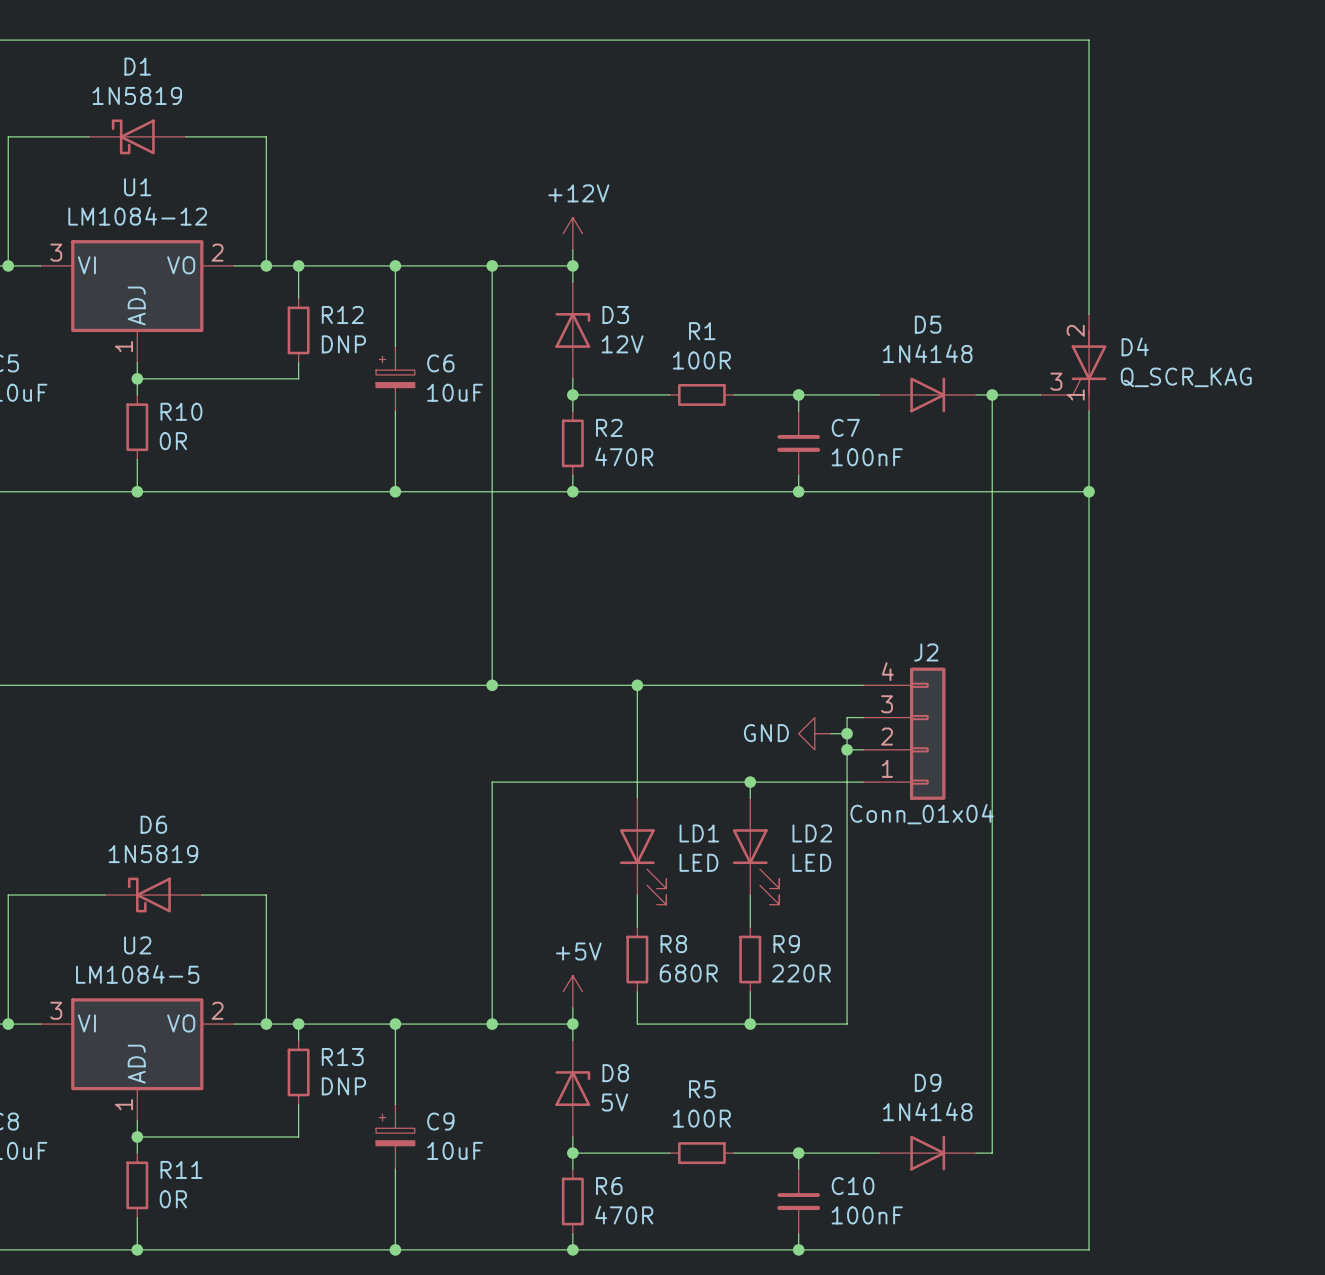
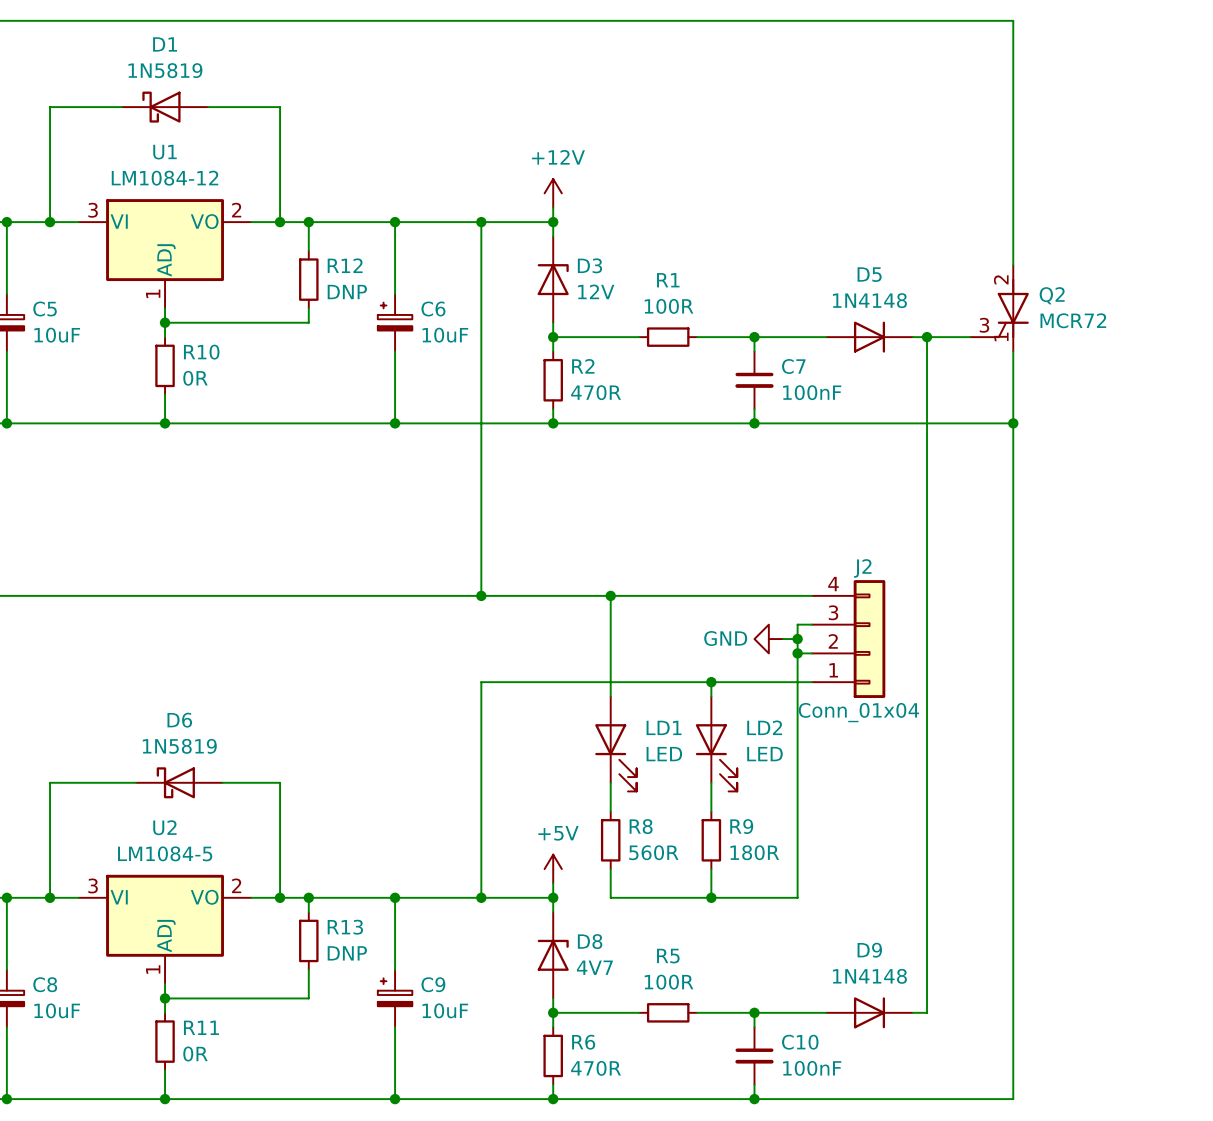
D4 name: D4 (1135, 346) -> Q2 (1052, 295)
D4 value: Q_SCR_KAG (1186, 377) -> MCR72 (1073, 320)
R8 value: 680R (688, 973) -> 560R (653, 852)
R9 value: 220R (801, 973) -> 180R (754, 852)
D8 value: 5V (614, 1102) -> 4V7 (594, 967)

